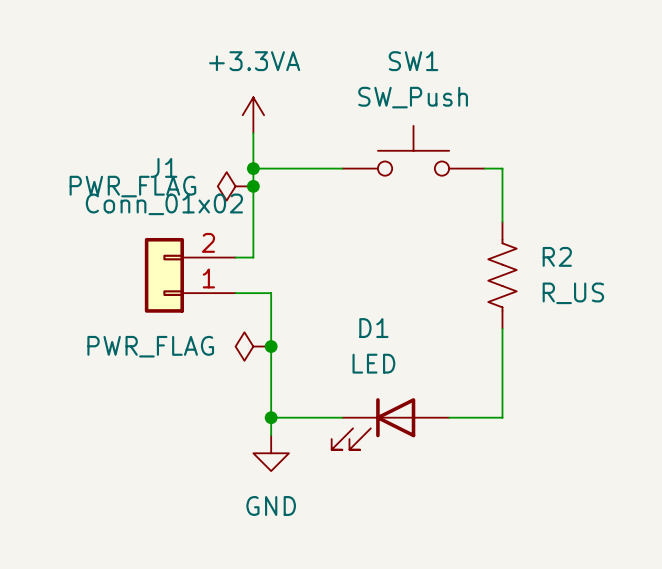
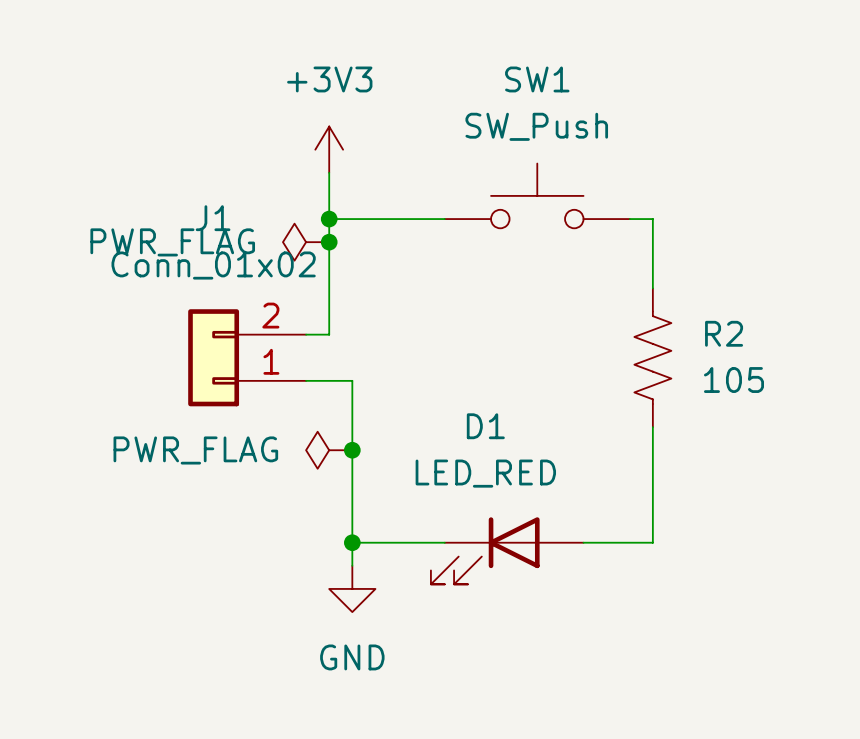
power symbol: +3.3VA (253, 115) -> +3V3 (329, 149)
R2 value: R_US (573, 293) -> 105 (733, 380)
D1 value: LED (373, 363) -> LED_RED (485, 473)

